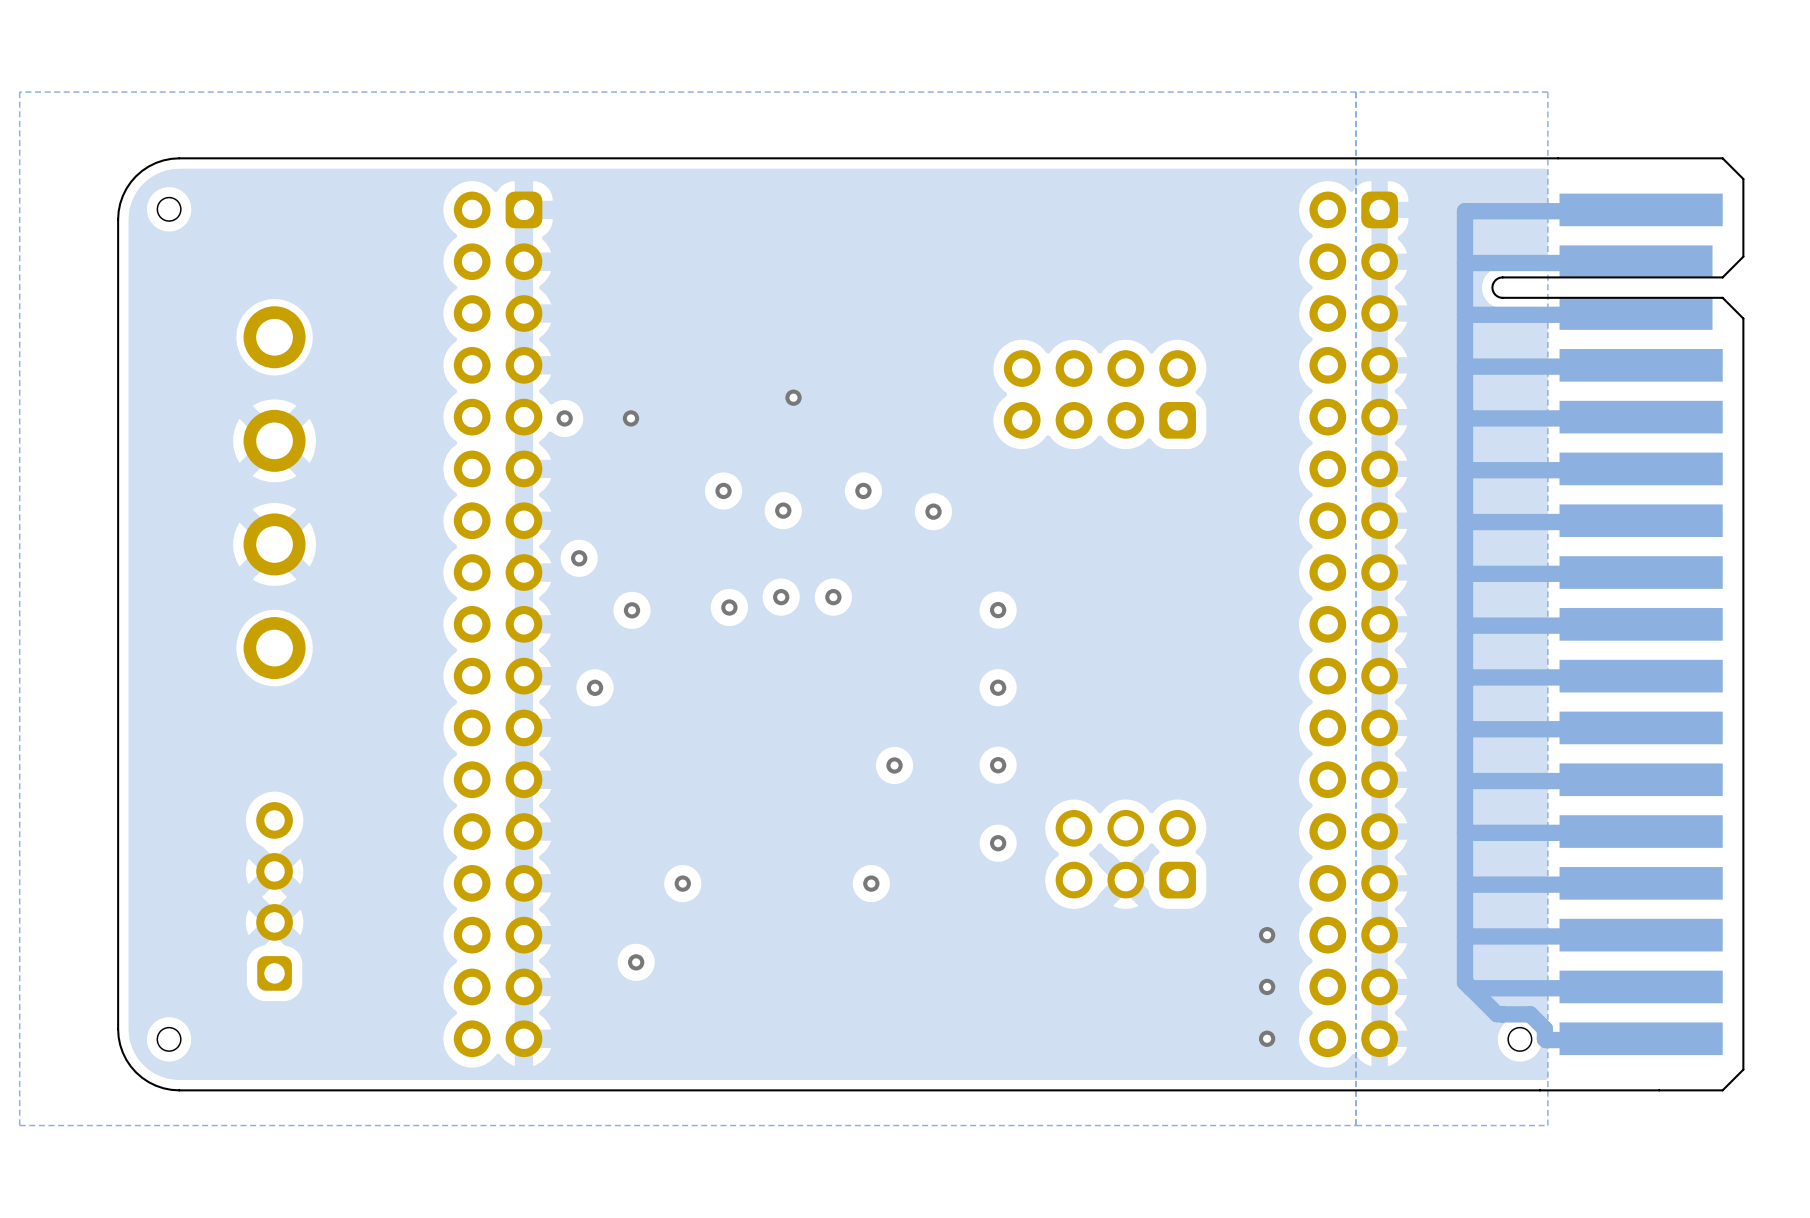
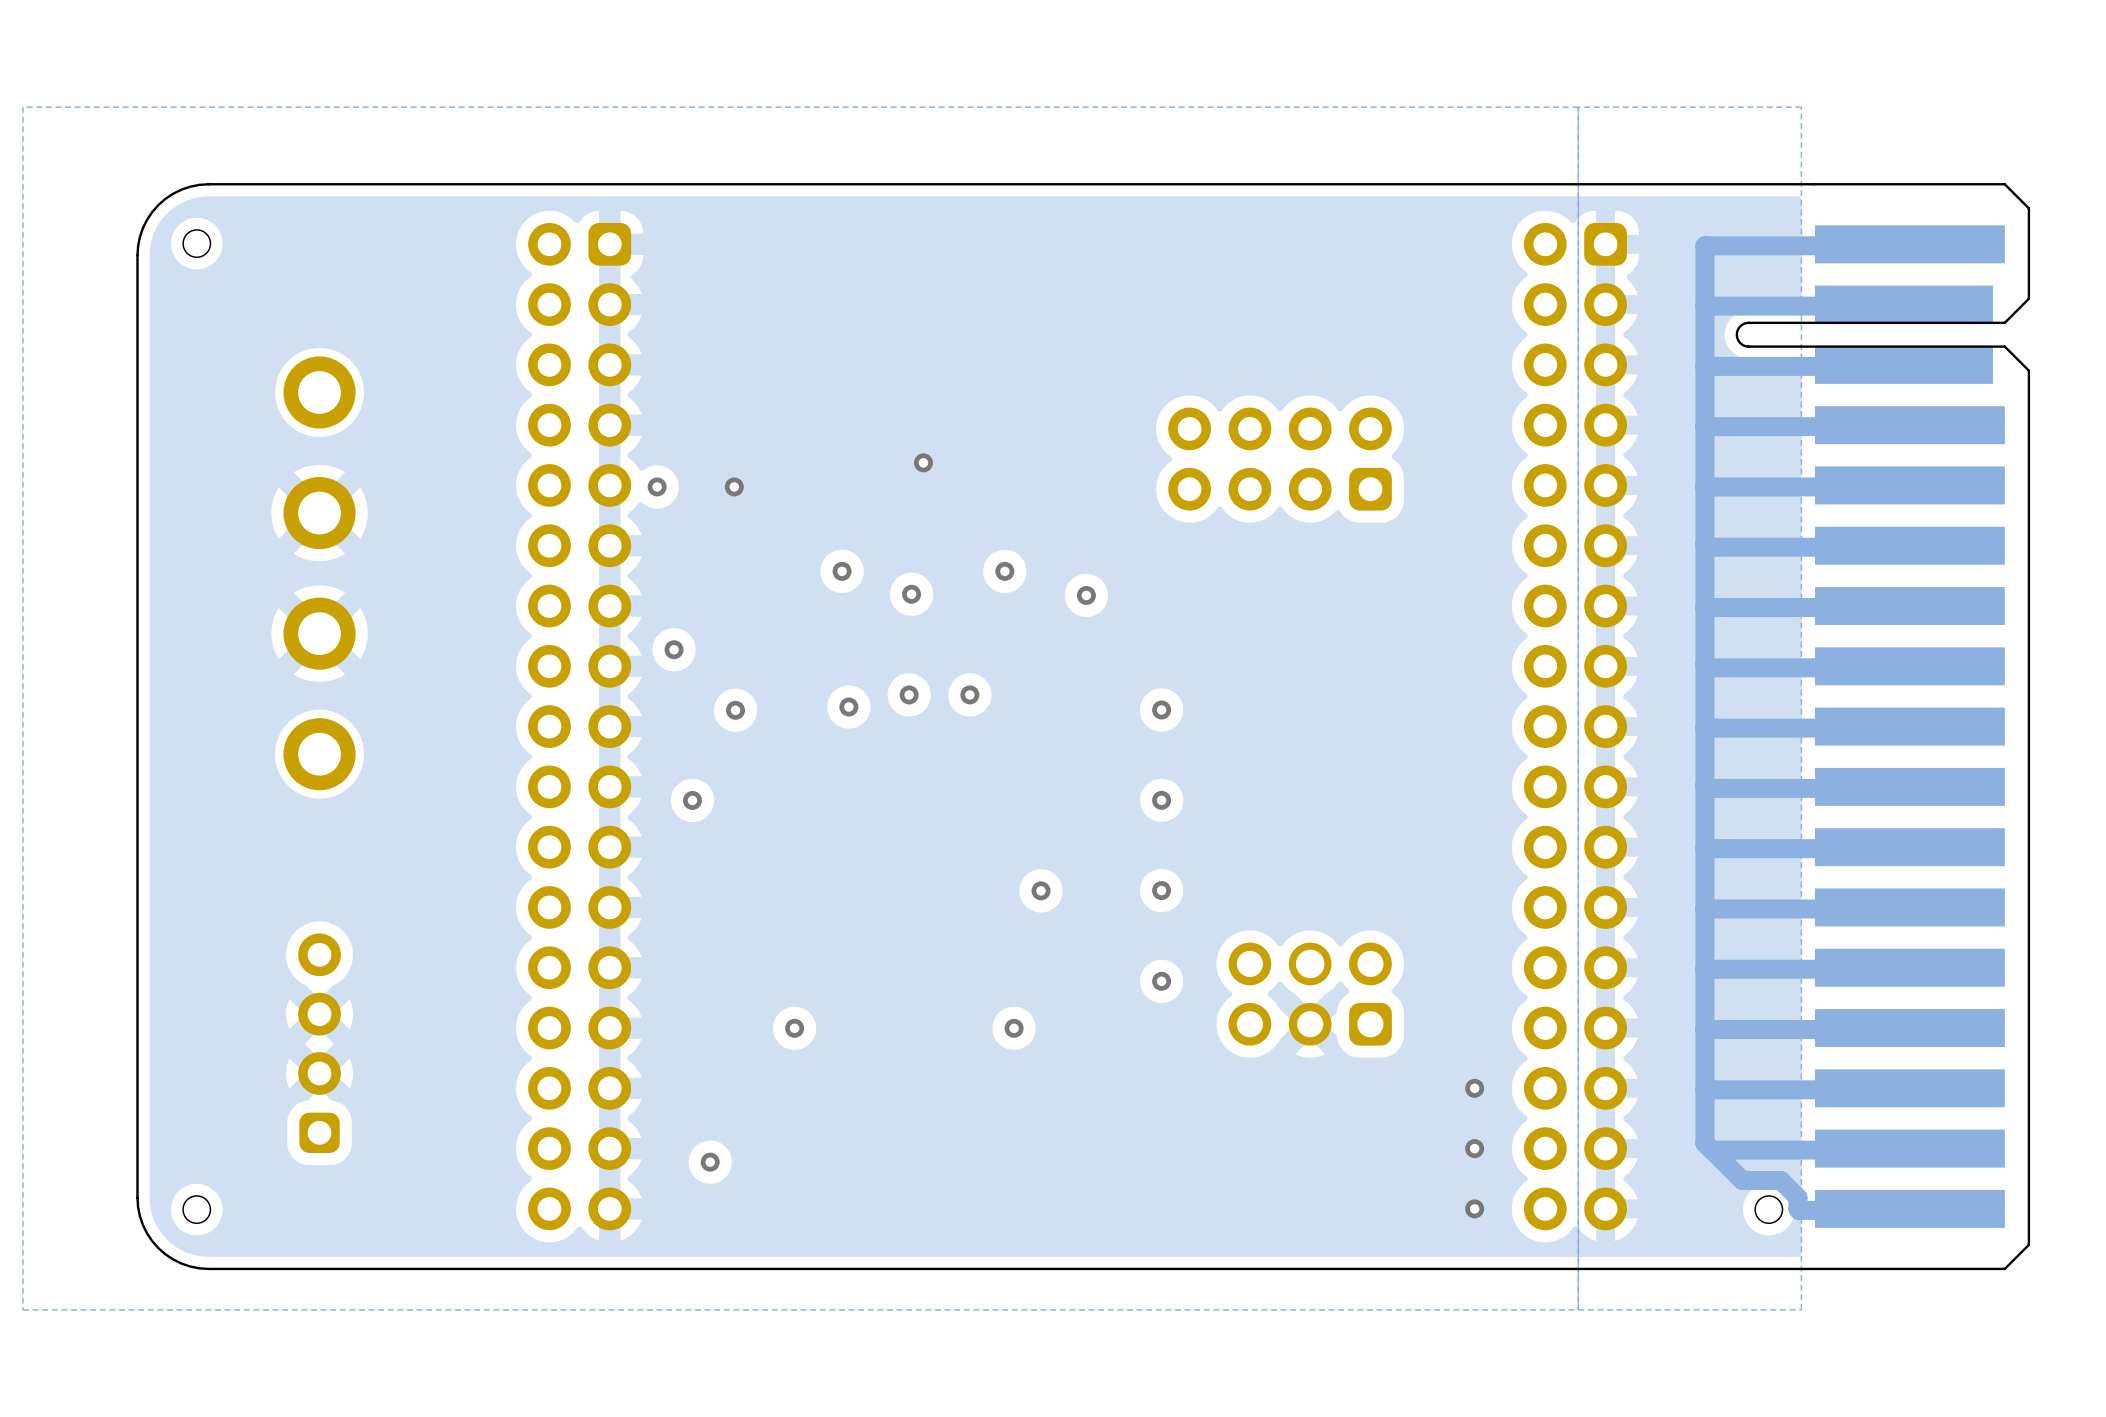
via position: (636, 962) -> (710, 1162)

